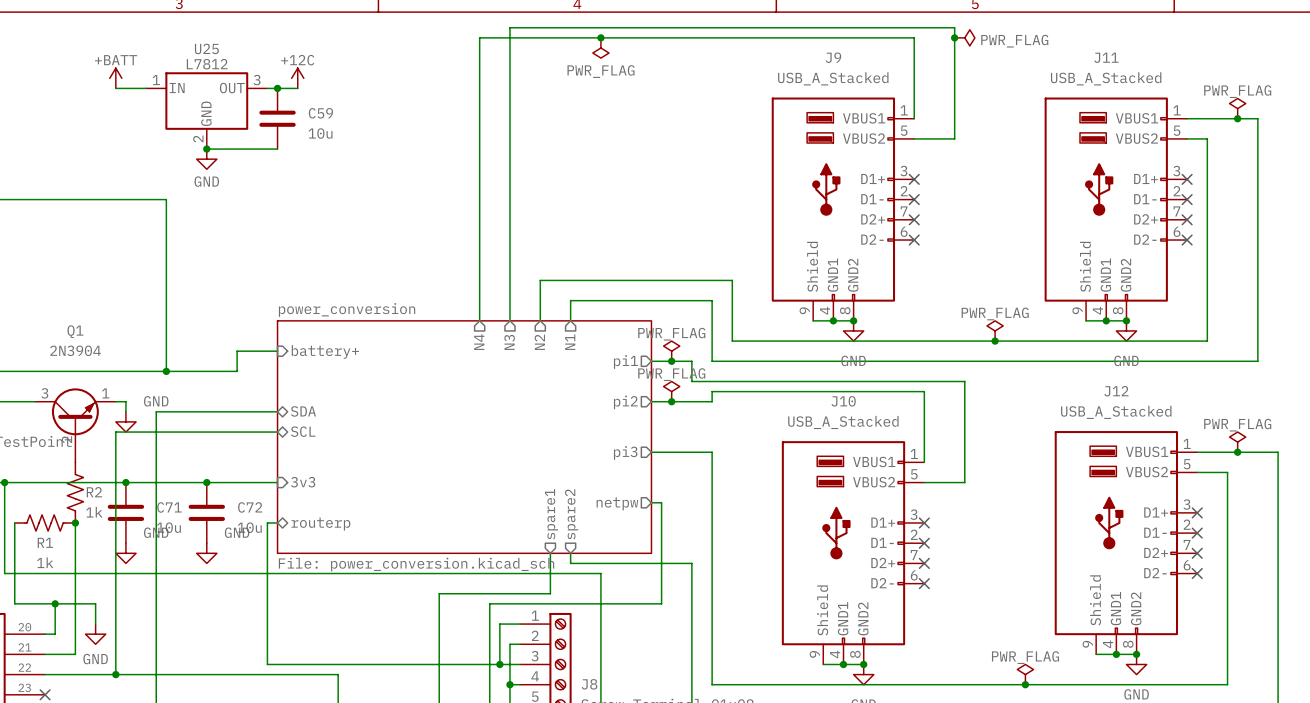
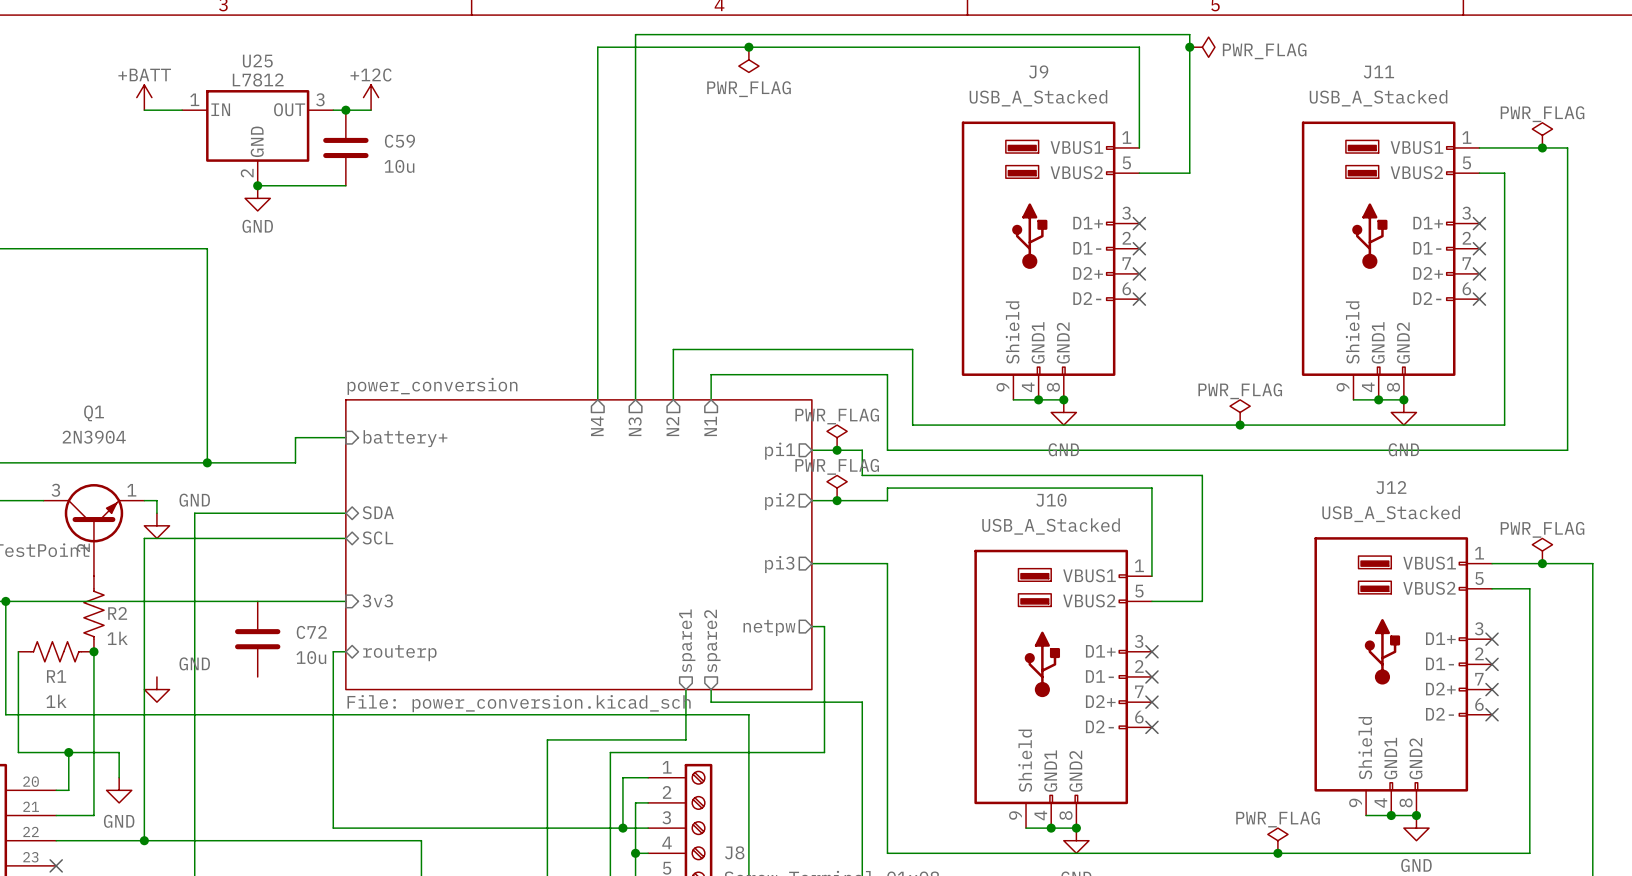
junction: (125, 482) -> none
junction: (206, 482) -> none
C71: 10u (125, 512) -> none
power symbol: GND (206, 553) -> none

